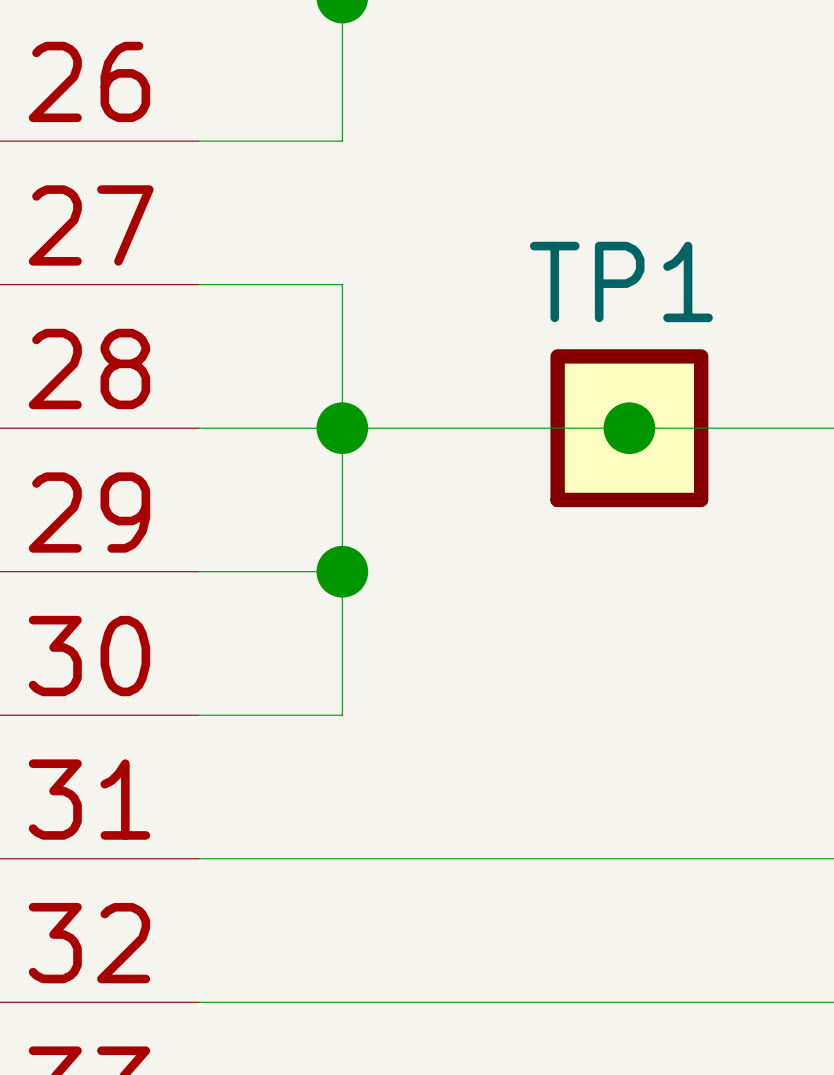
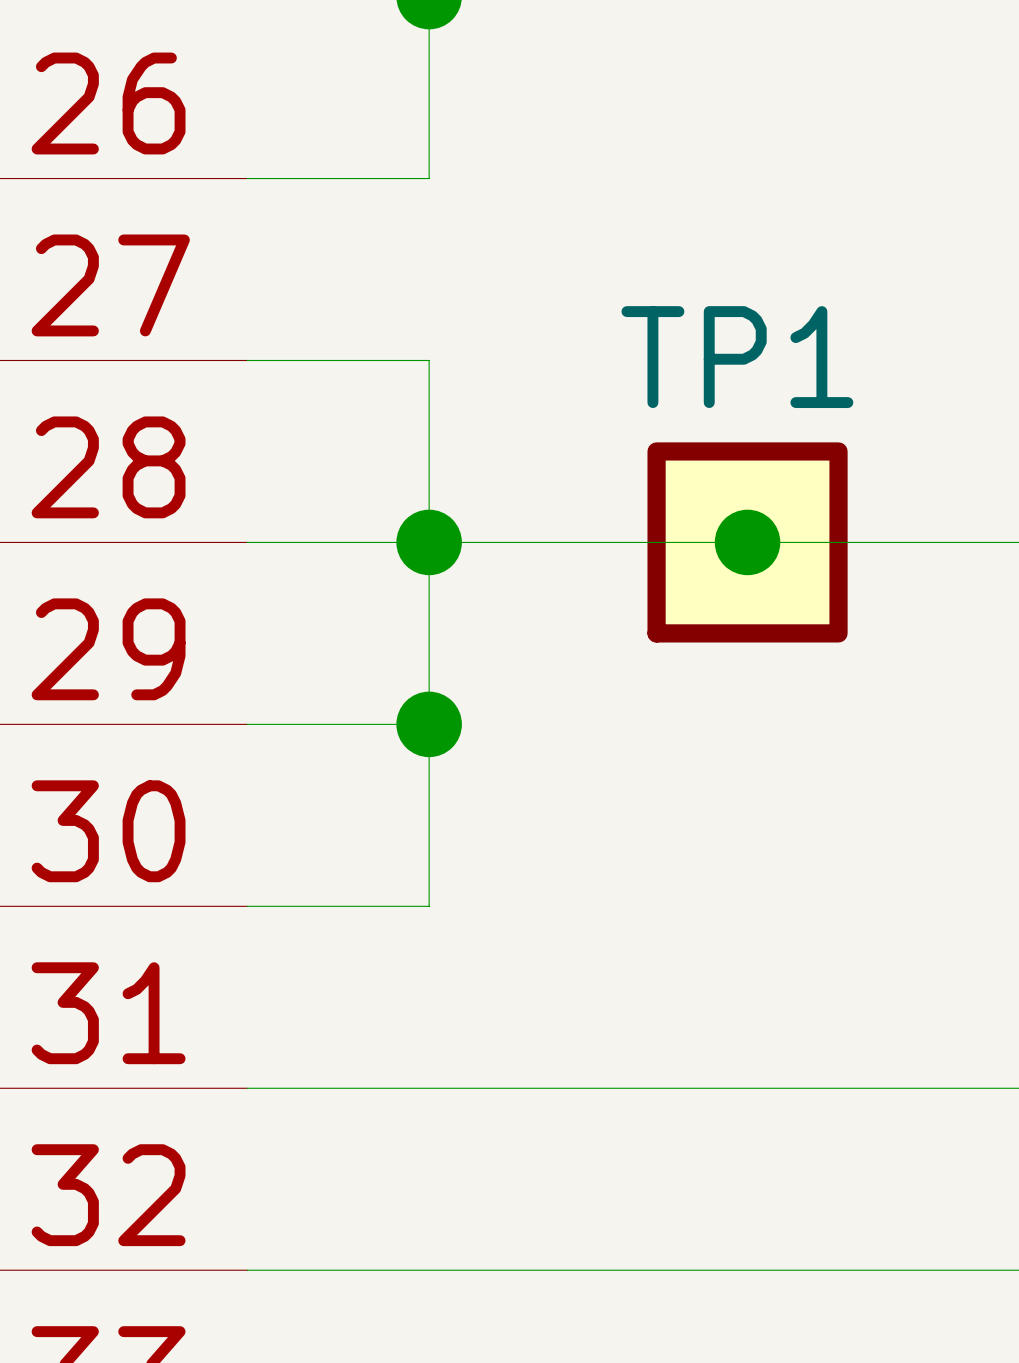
junction position: (629, 428) -> (747, 542)
TP1 position: (629, 428) -> (747, 542)

